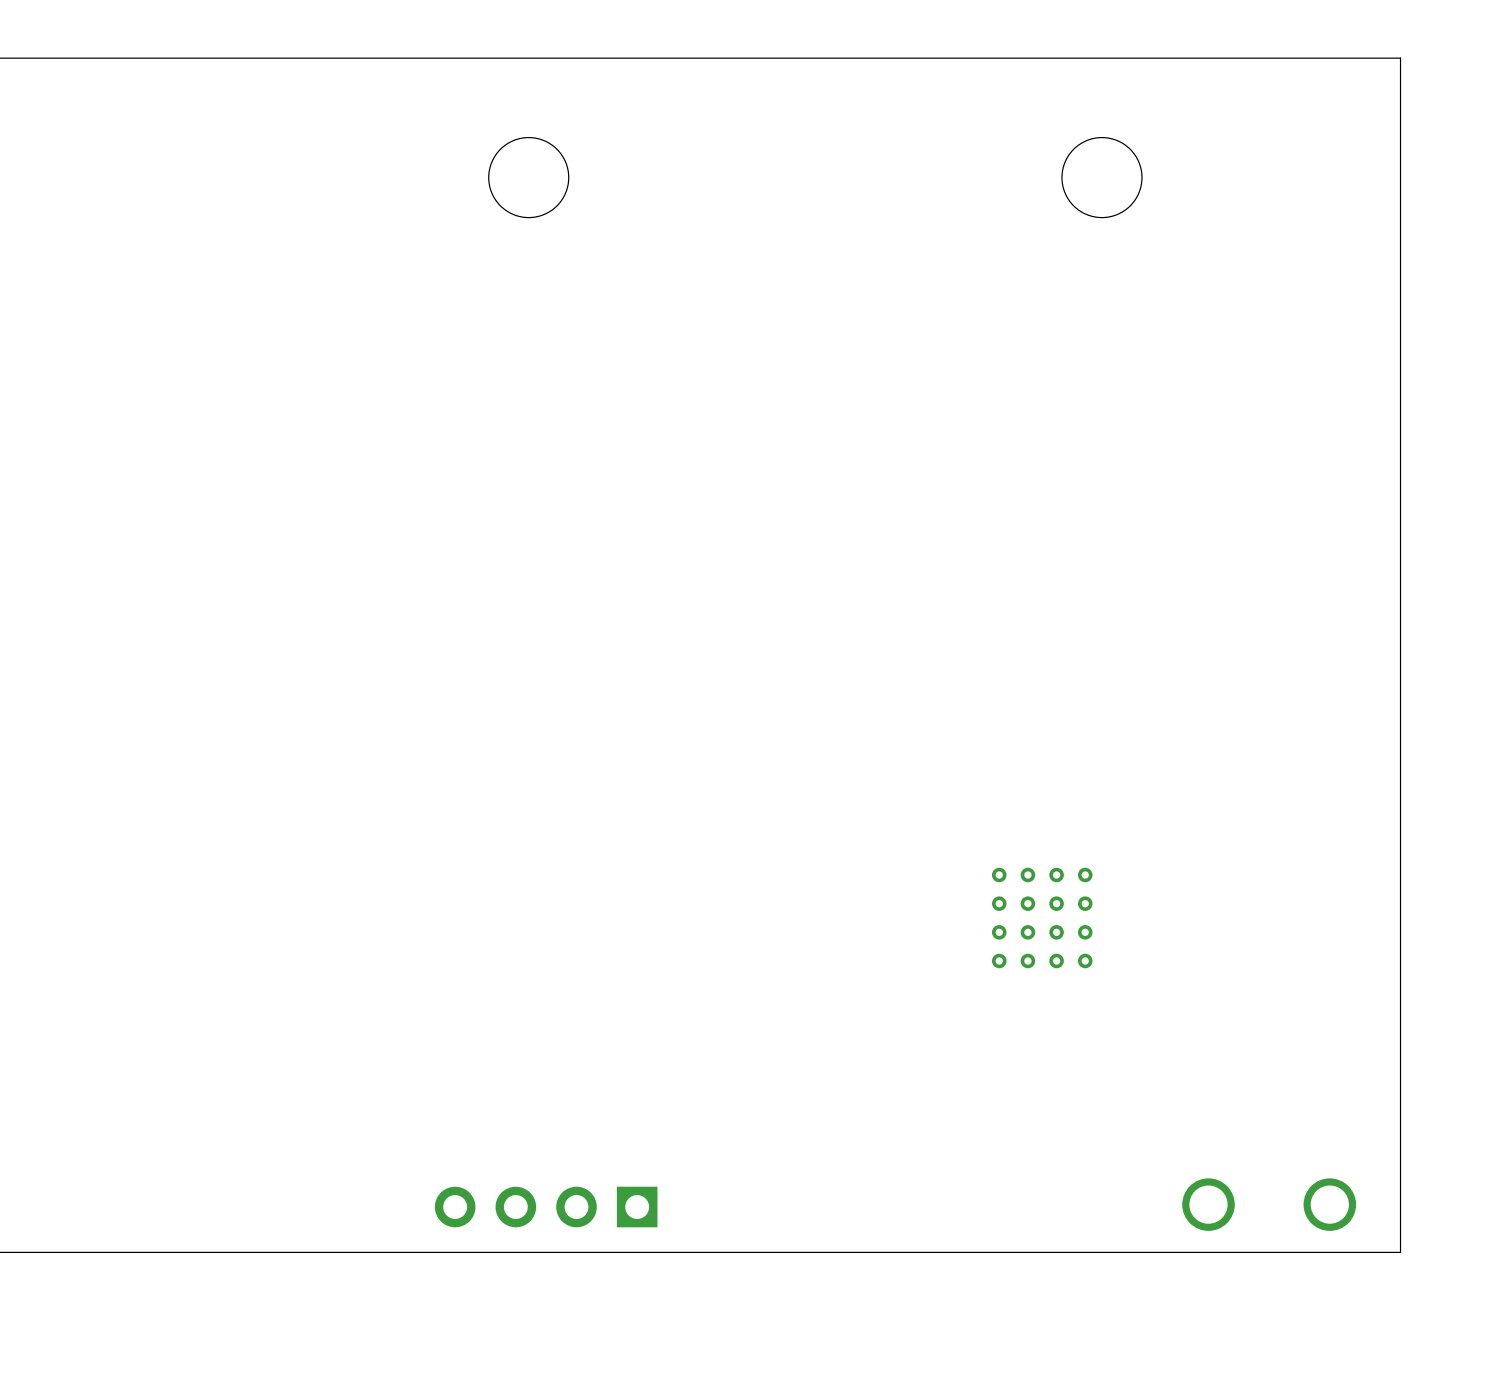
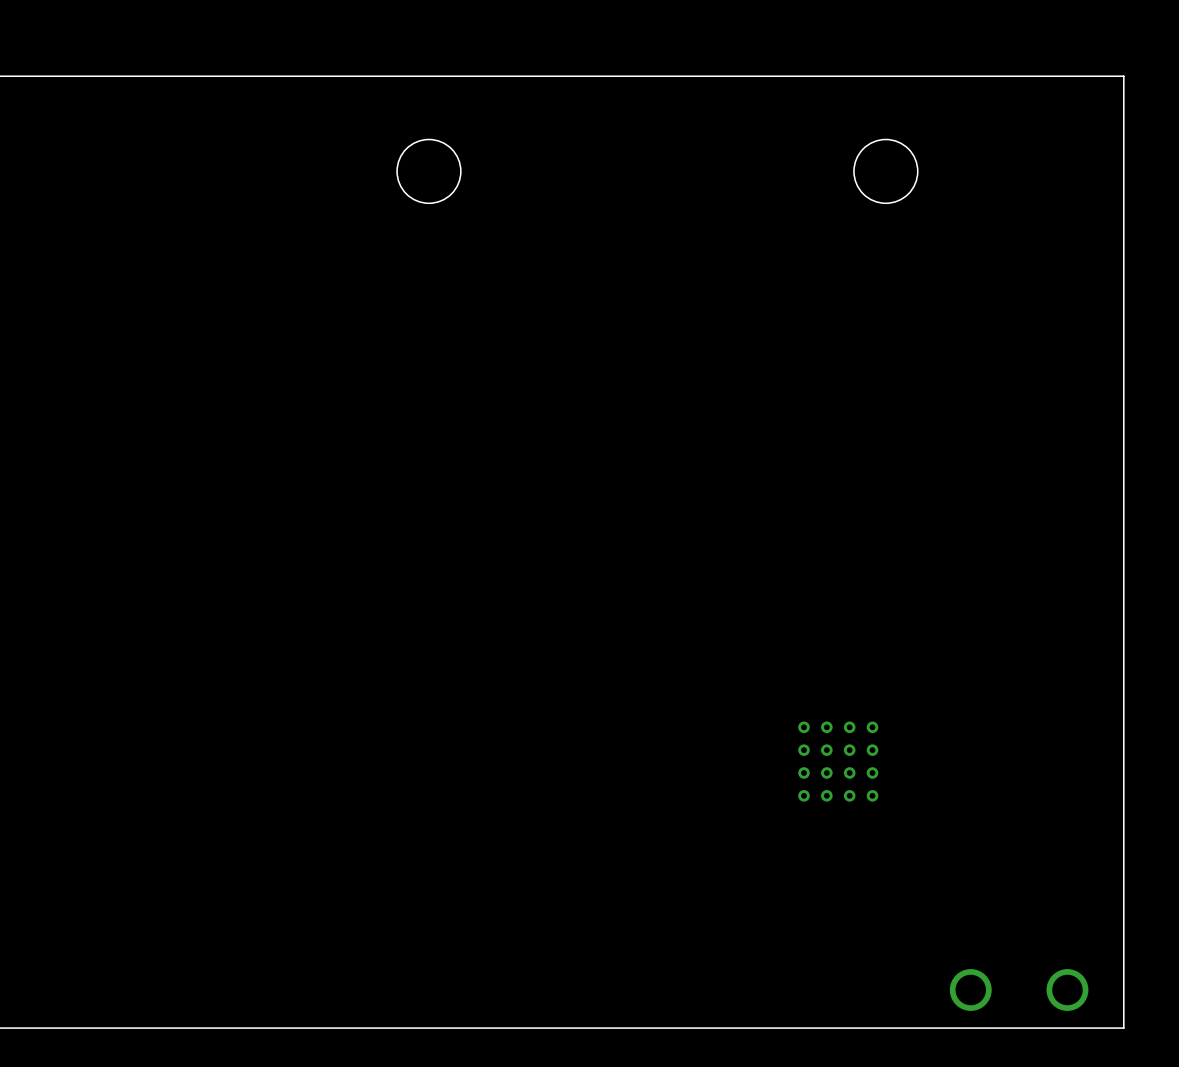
part: (546, 1207) -> none

